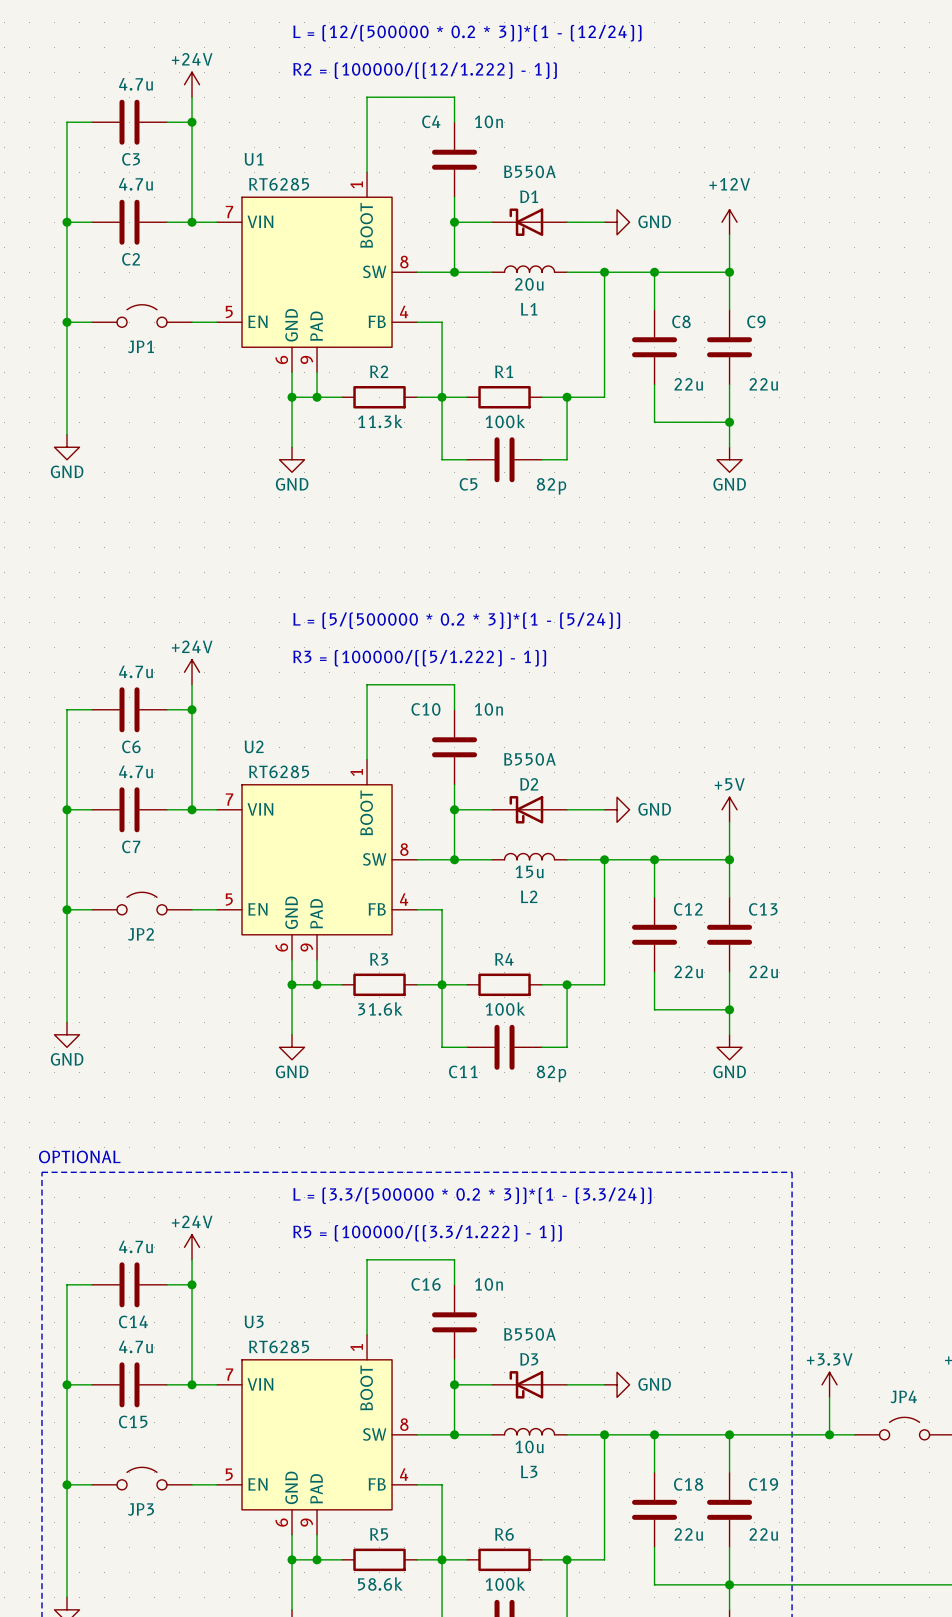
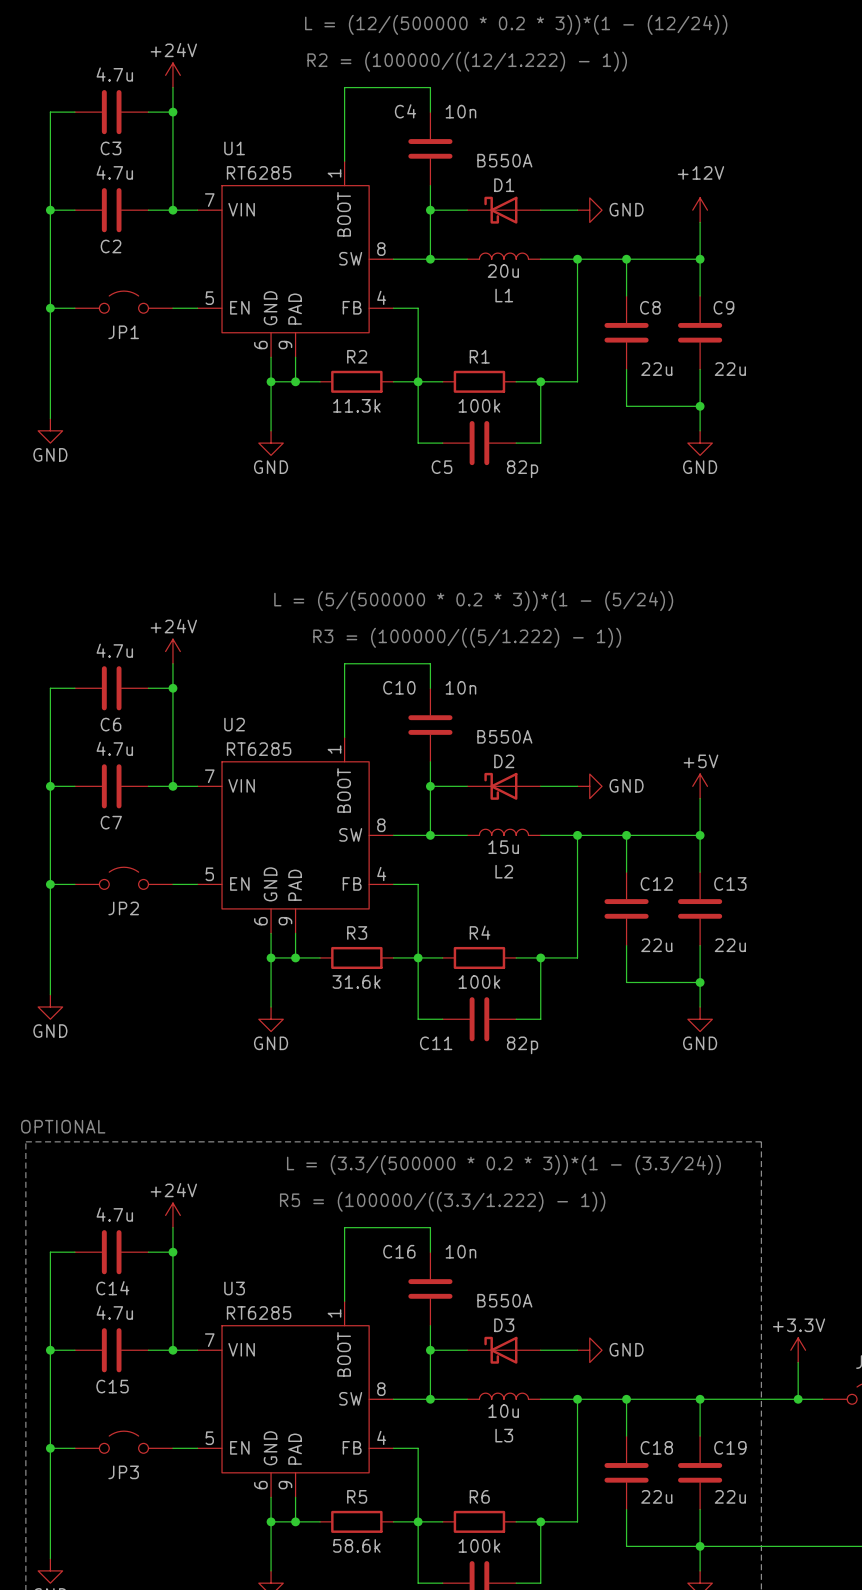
text: L = (12/(500000 * 0.2 * 3))*(1 - (12/24)) (467, 33) -> none
text: none -> L = (12/(500000 * 0.2 * 3))*(1 - (12/24)) (516, 24)
text position: R2 = (100000/((12/1.222) - 1)) (425, 70) -> R2 = (100000/((12/1.222) - 1)) (467, 61)
text position: R3 = (100000/((5/1.222) - 1)) (419, 658) -> R3 = (100000/((5/1.222) - 1)) (467, 637)
text position: L = (3.3/(500000 * 0.2 * 3))*(1 - (3.3/24)) (472, 1195) -> L = (3.3/(500000 * 0.2 * 3))*(1 - (3.3/24)) (503, 1164)
text position: R5 = (100000/((3.3/1.222) - 1)) (427, 1233) -> R5 = (100000/((3.3/1.222) - 1)) (442, 1201)

